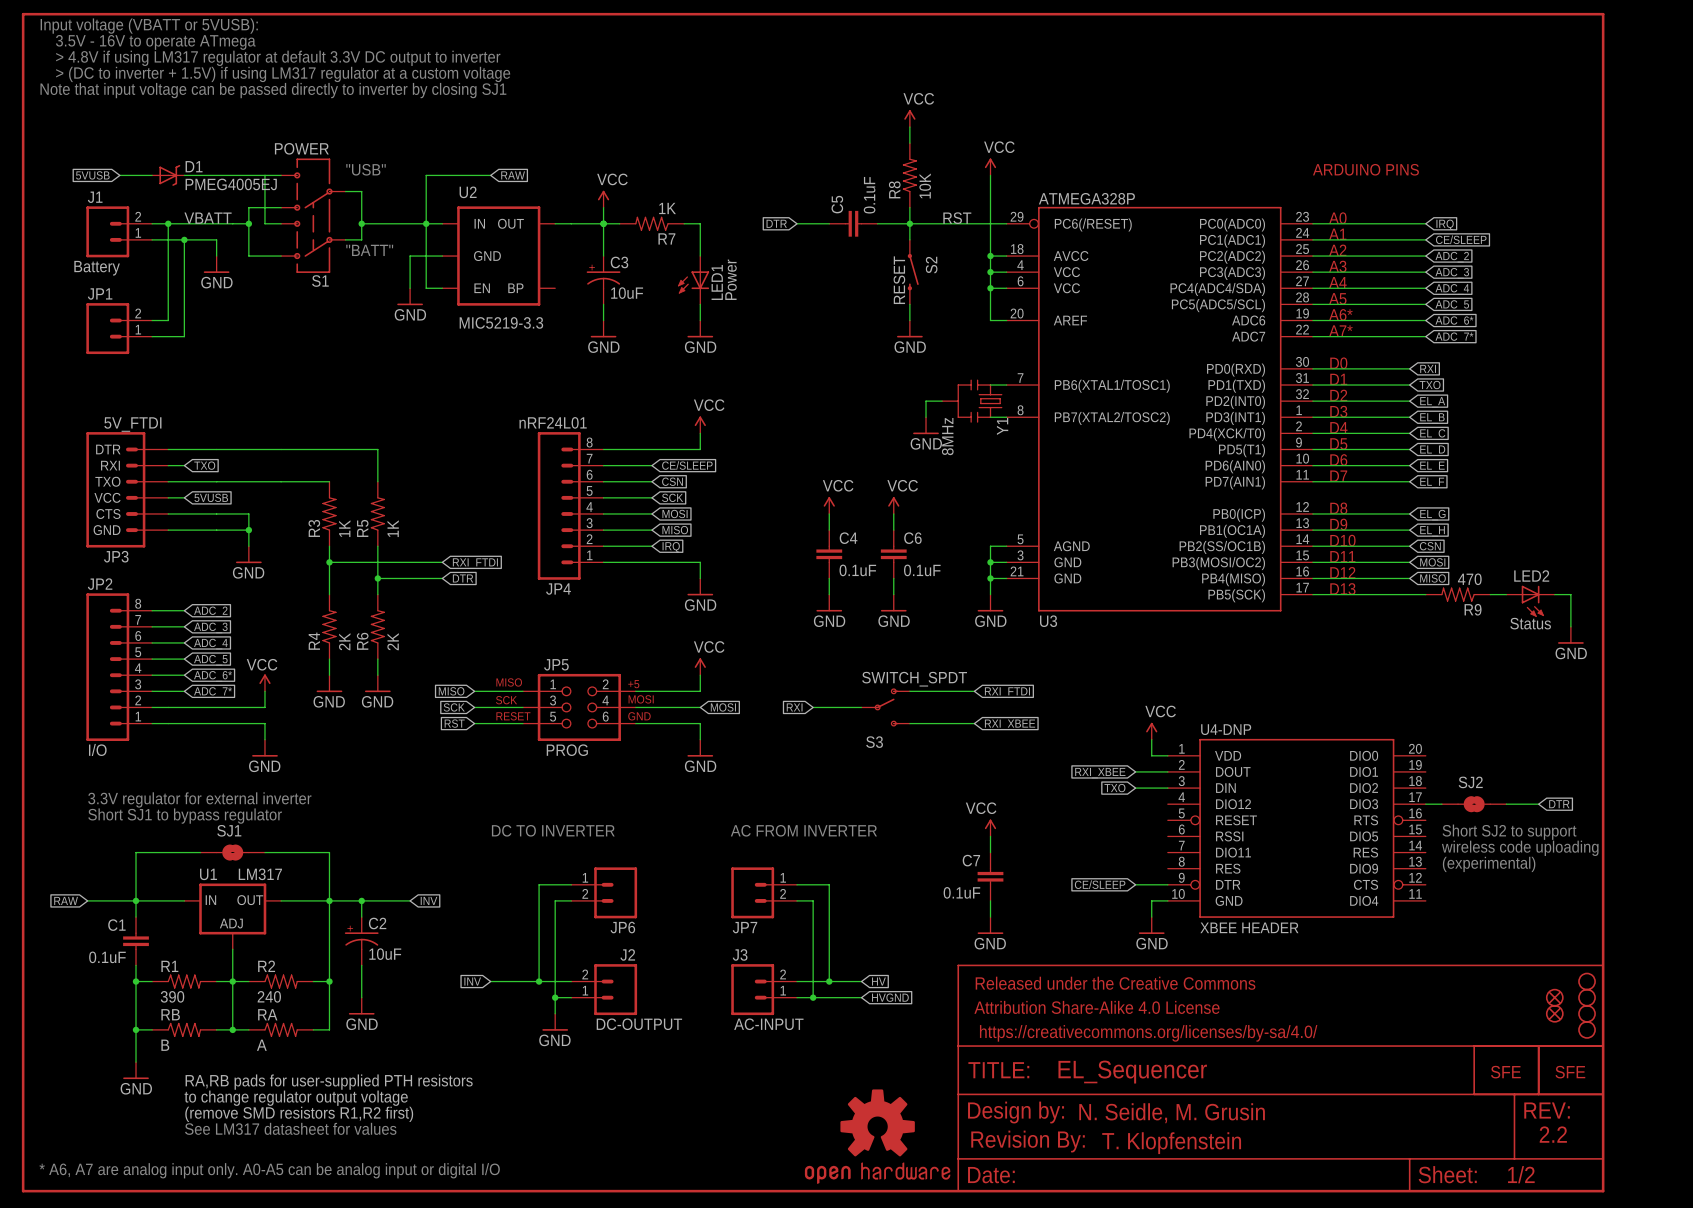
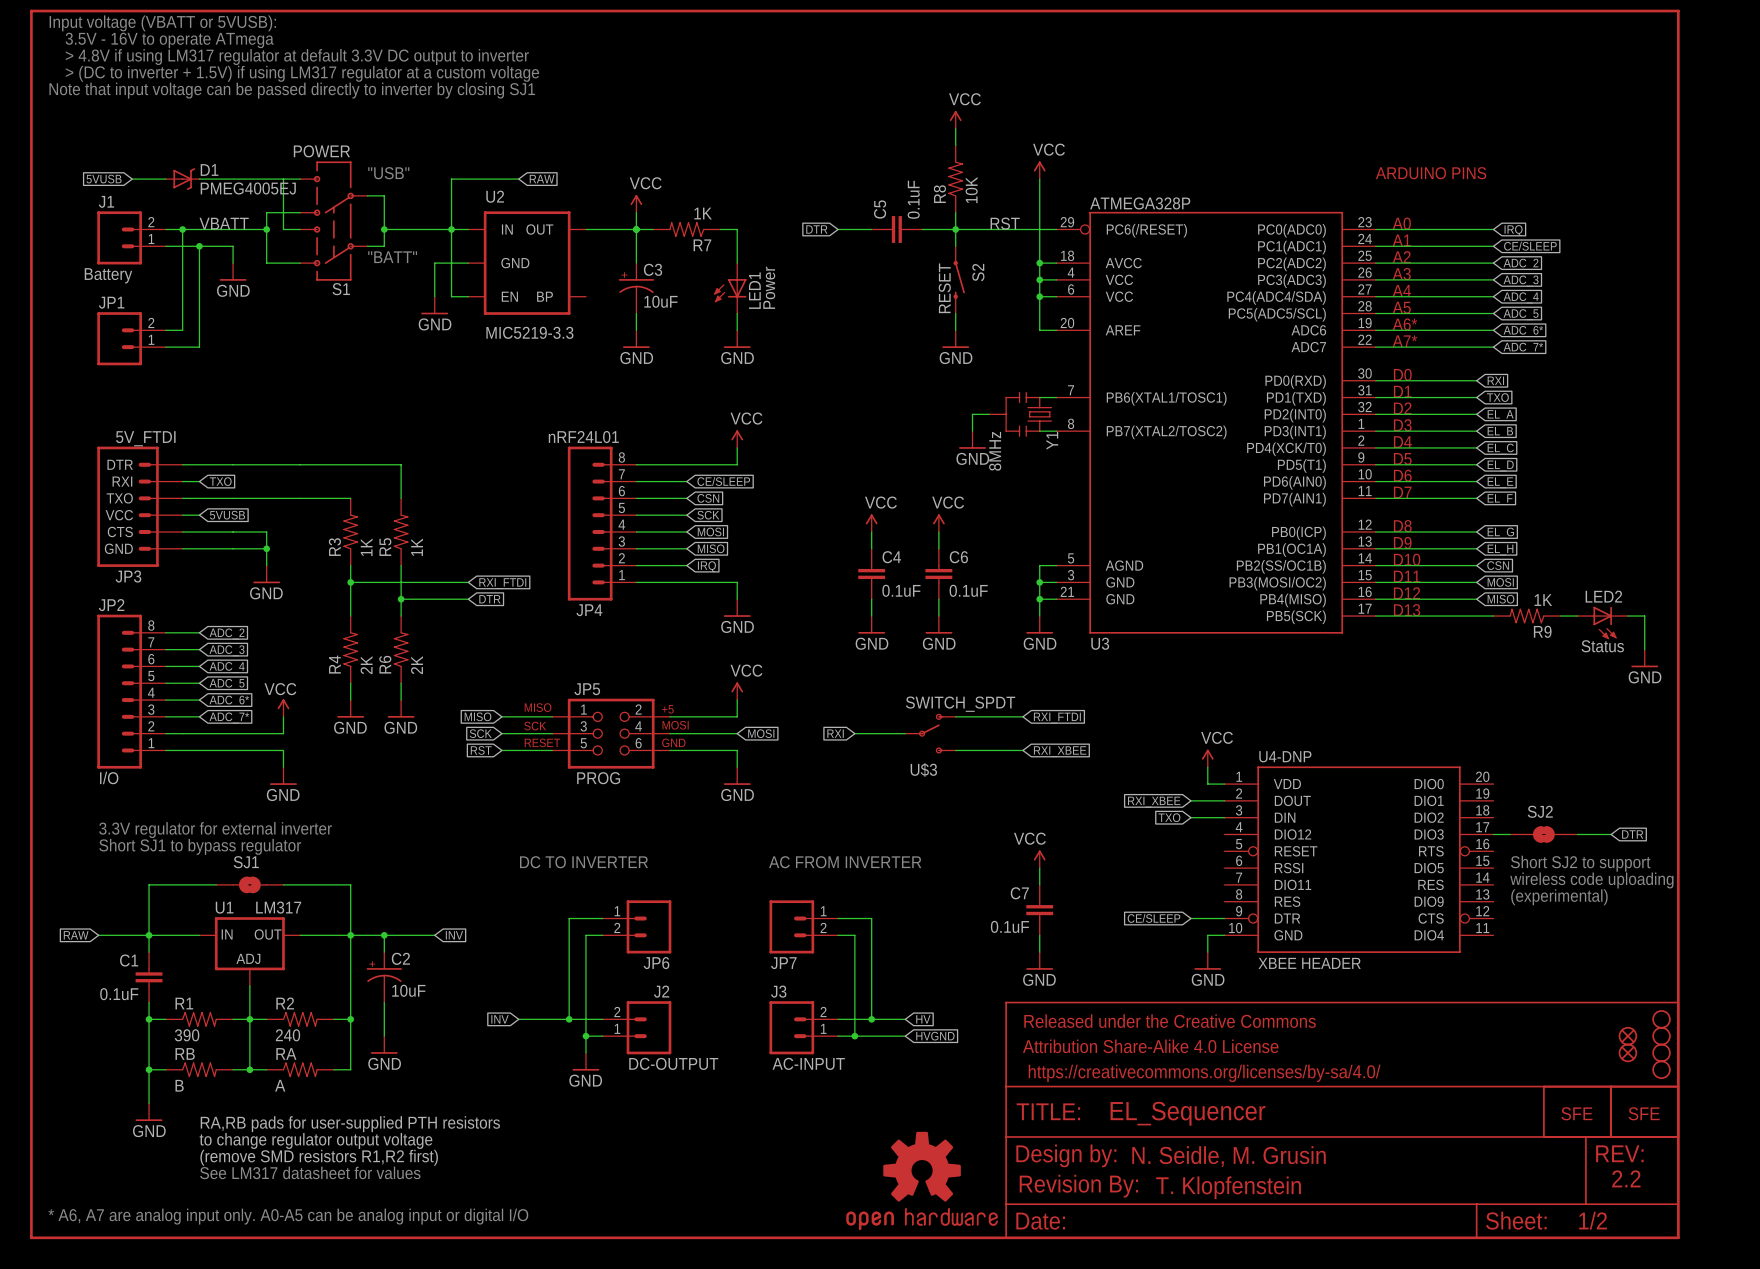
R9 value: 470 (1469, 579) -> 1K (1543, 600)
S3 name: S3 (874, 742) -> U$3 (923, 769)

